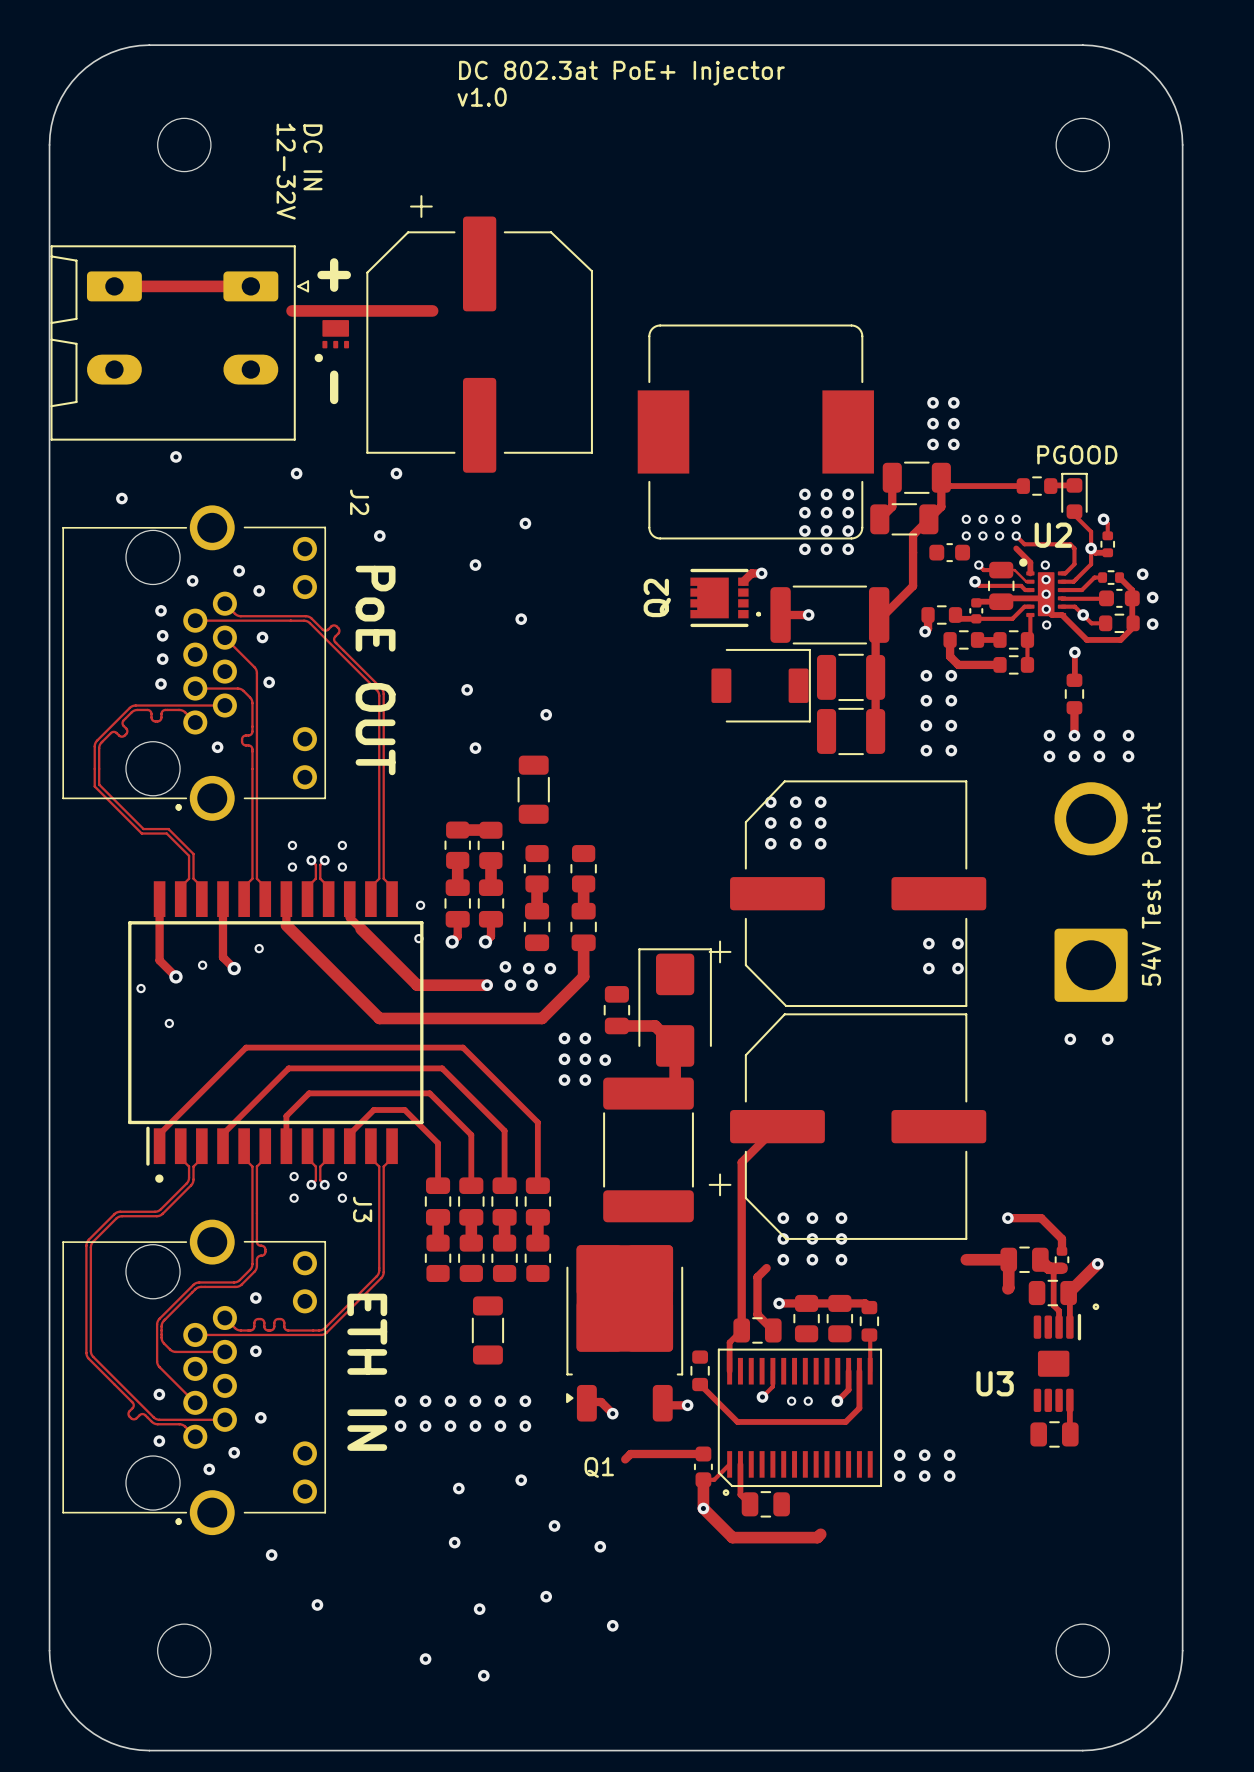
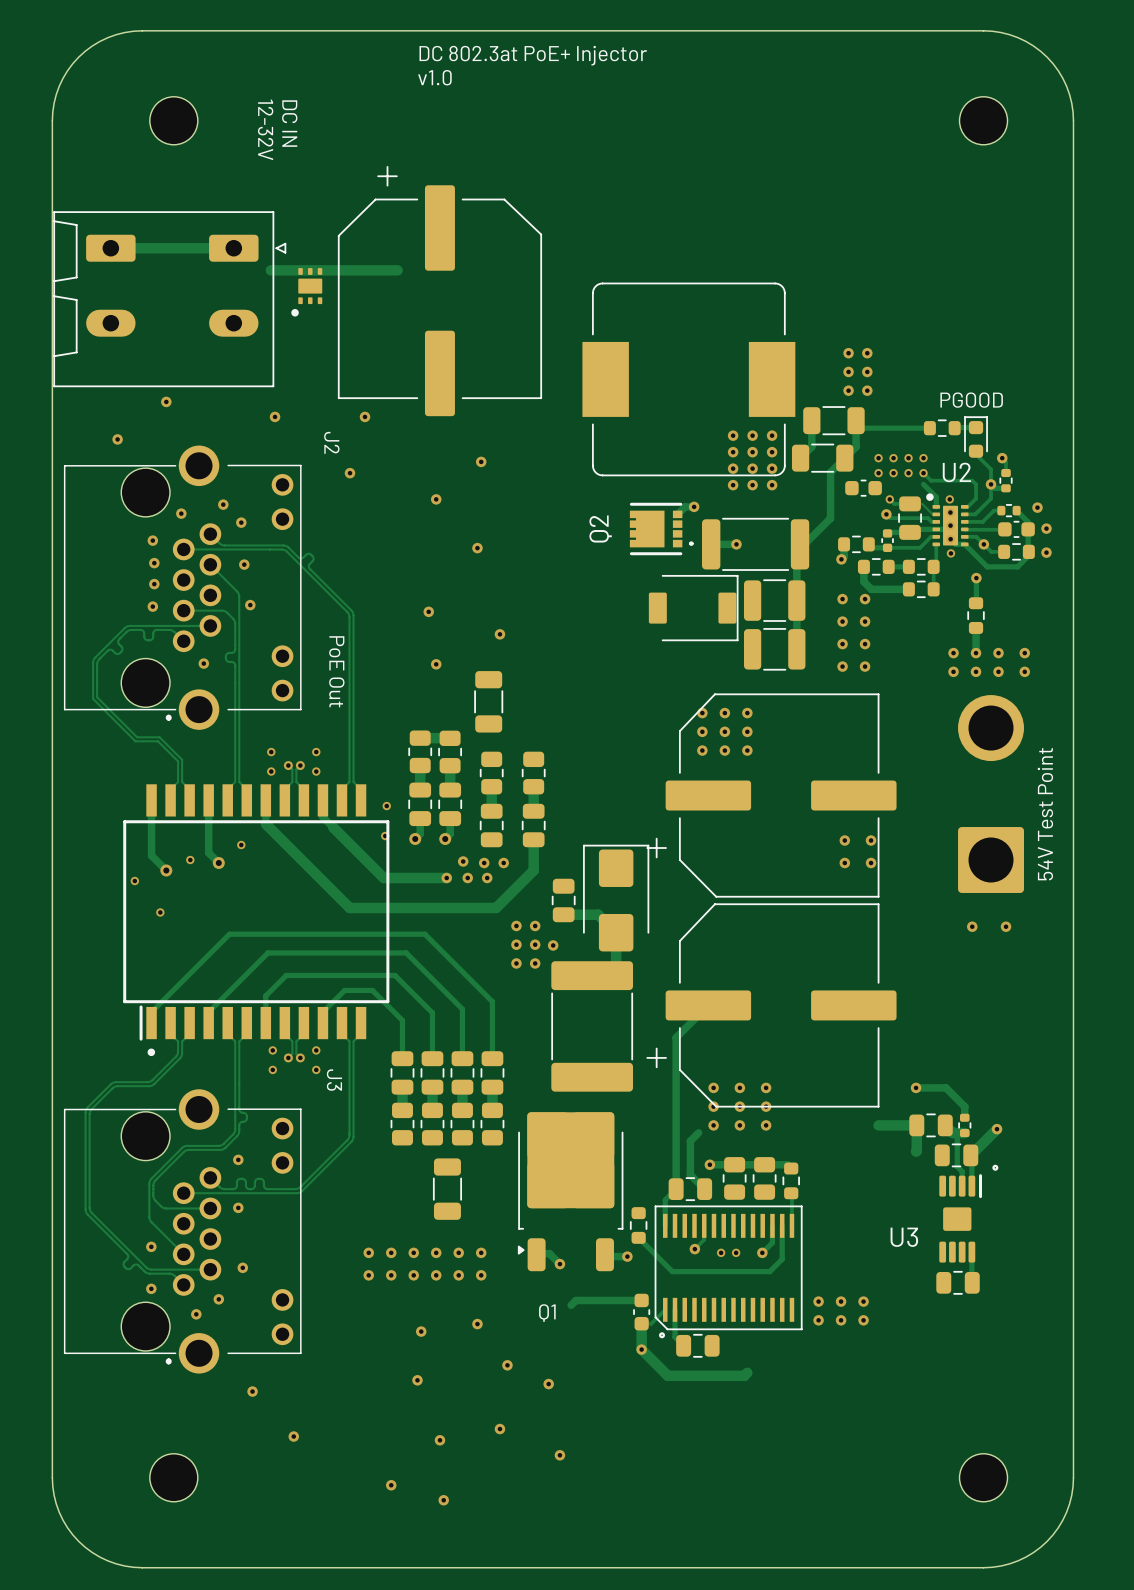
text: + (334, 275) -> none
text: - (334, 387) -> none
text: PoE OUT (375, 670) -> PoE Out (336, 671)
text: ETH IN (367, 1372) -> none

